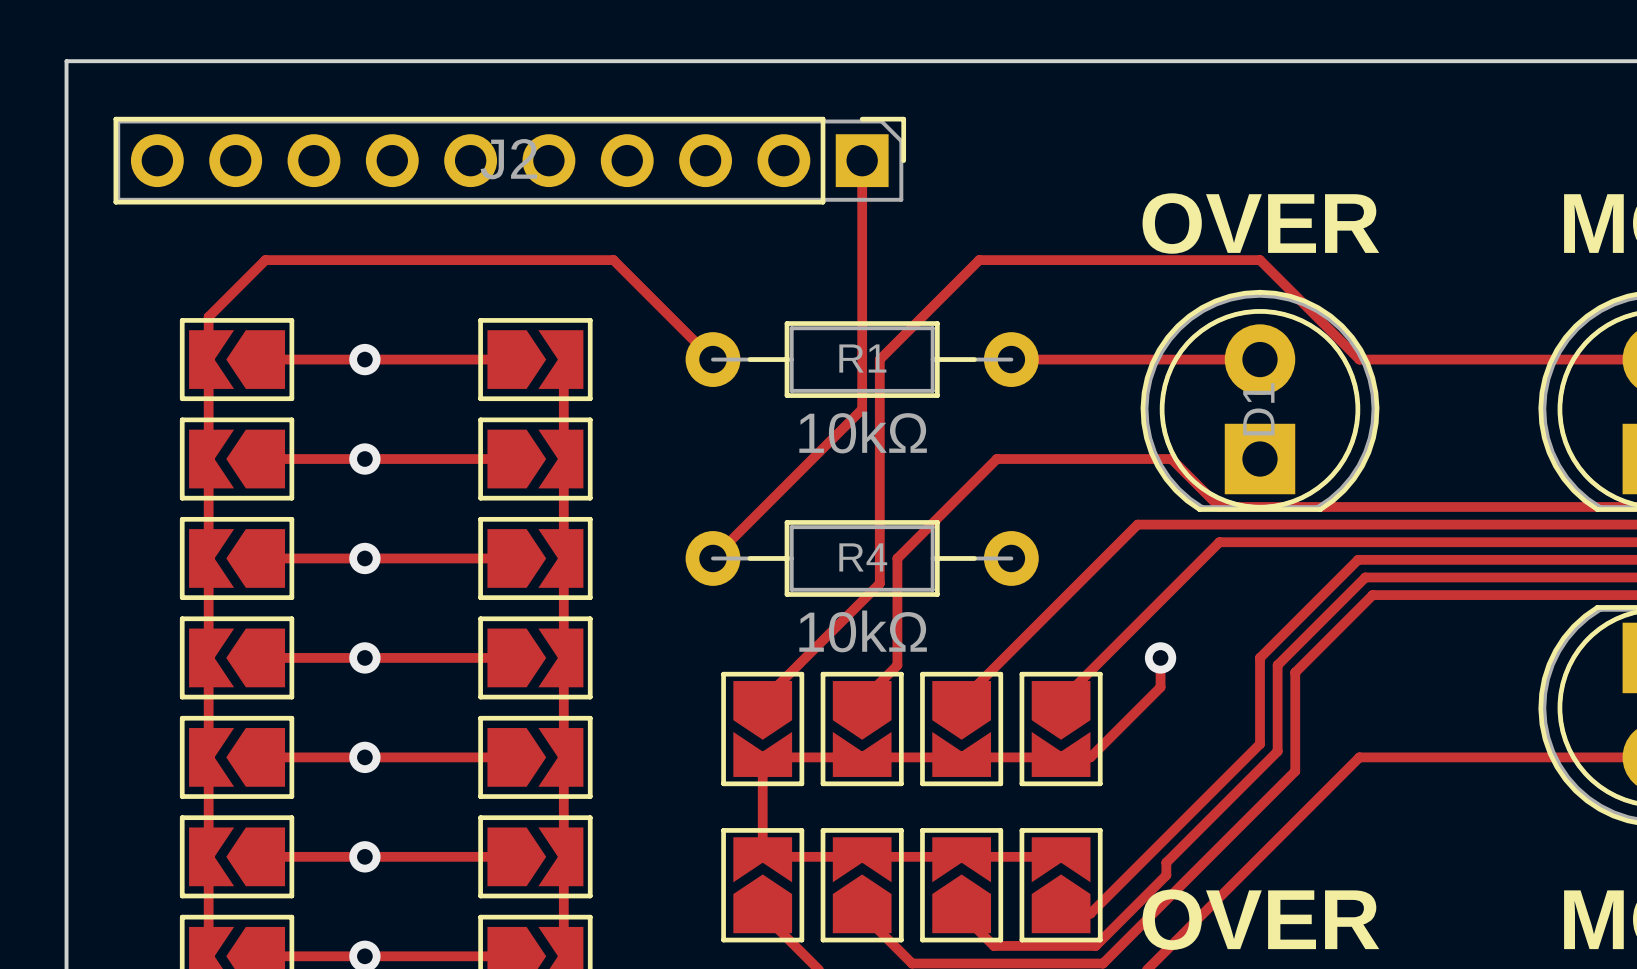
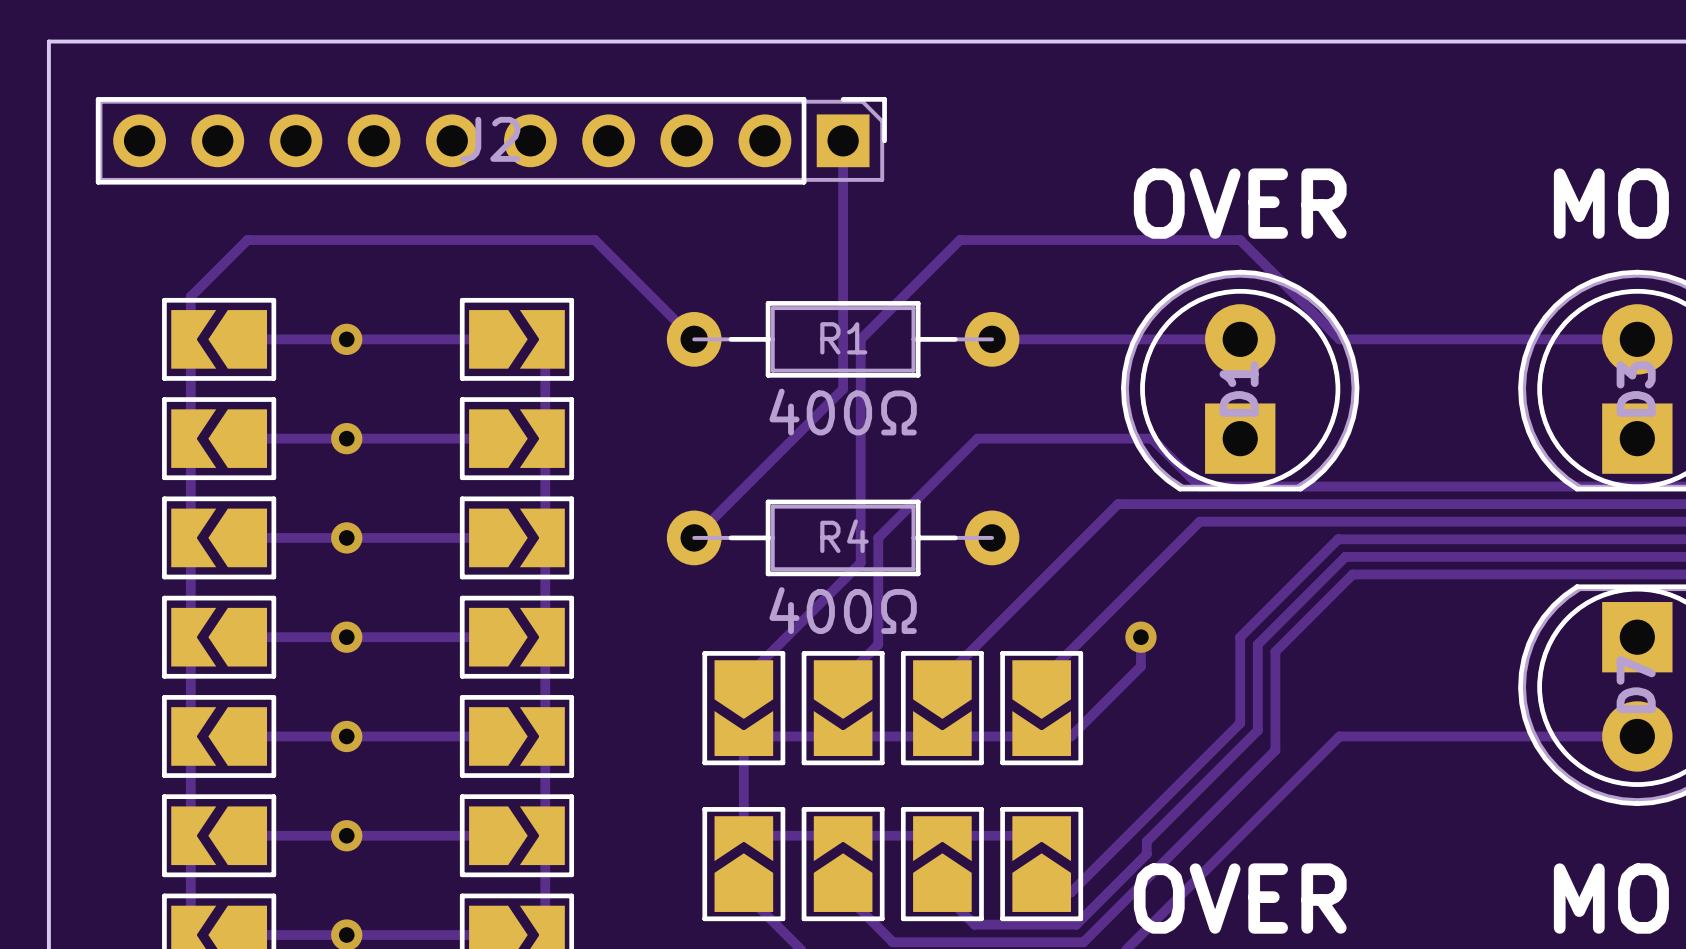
R1 value: 10kΩ (863, 432) -> 400Ω (843, 412)
R4 value: 10kΩ (863, 631) -> 400Ω (843, 610)

